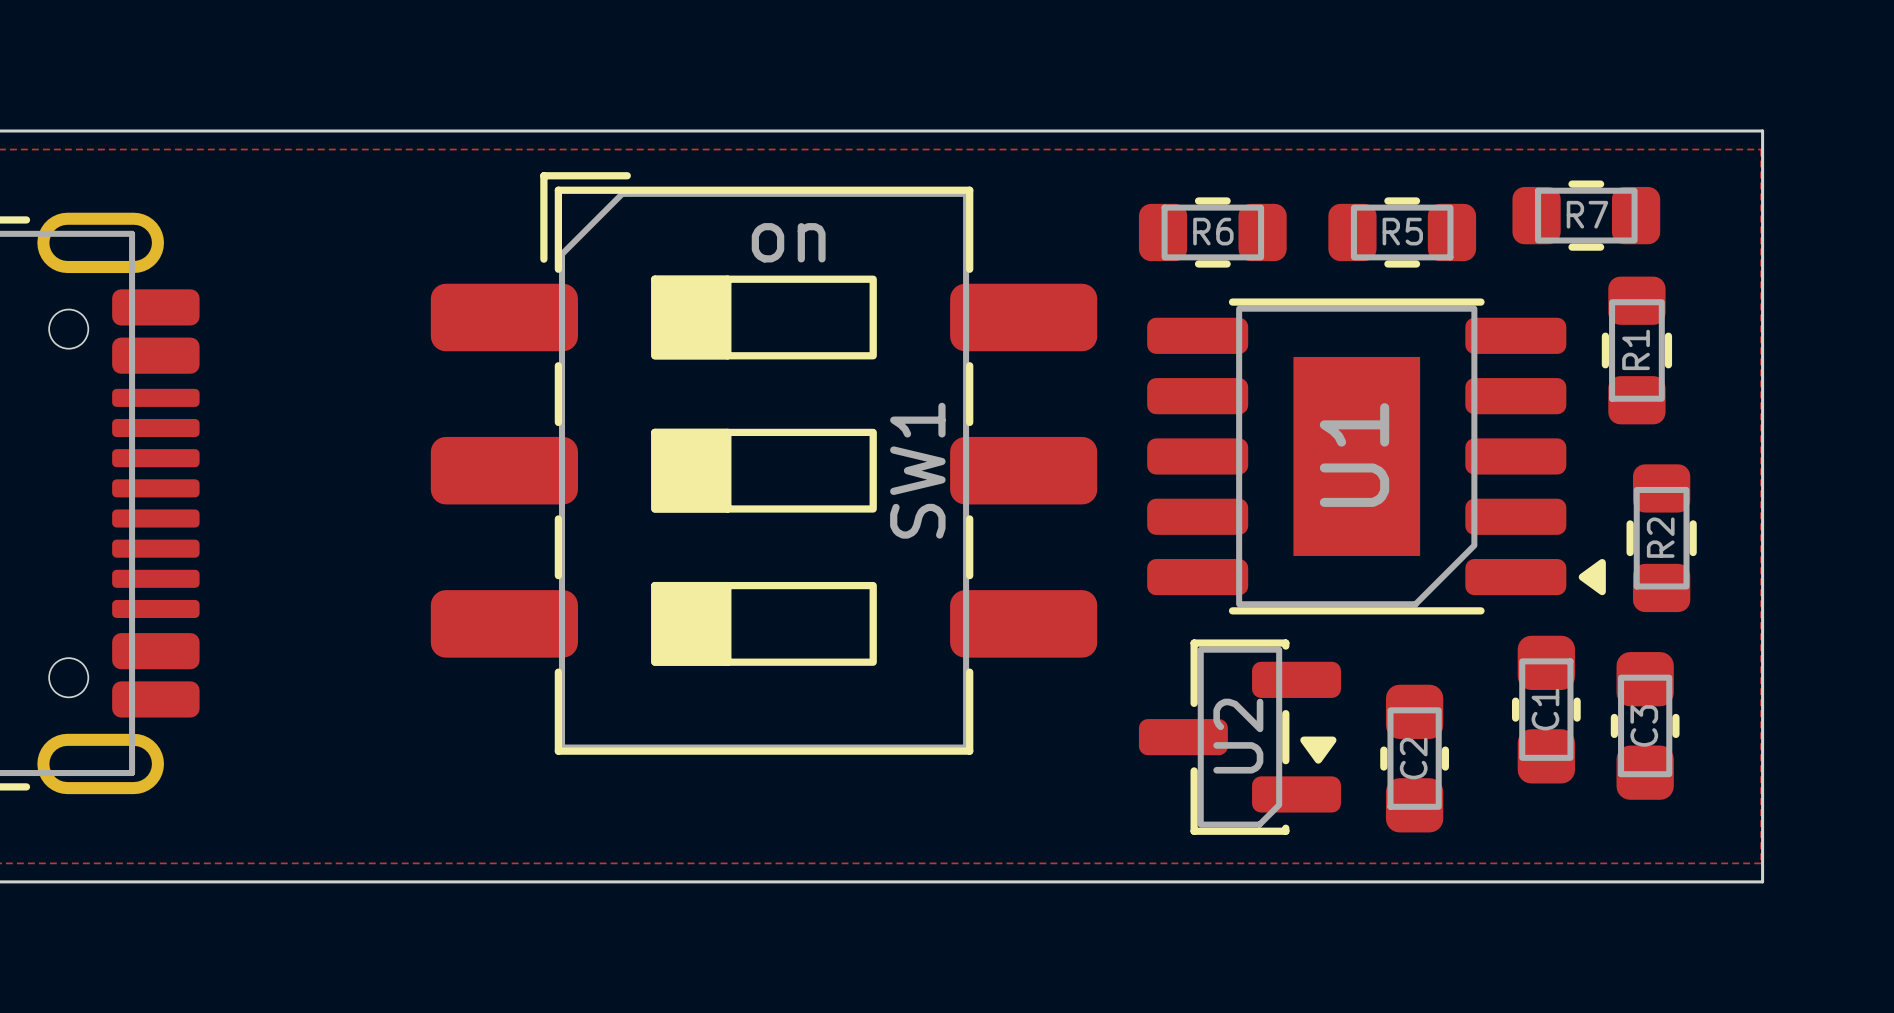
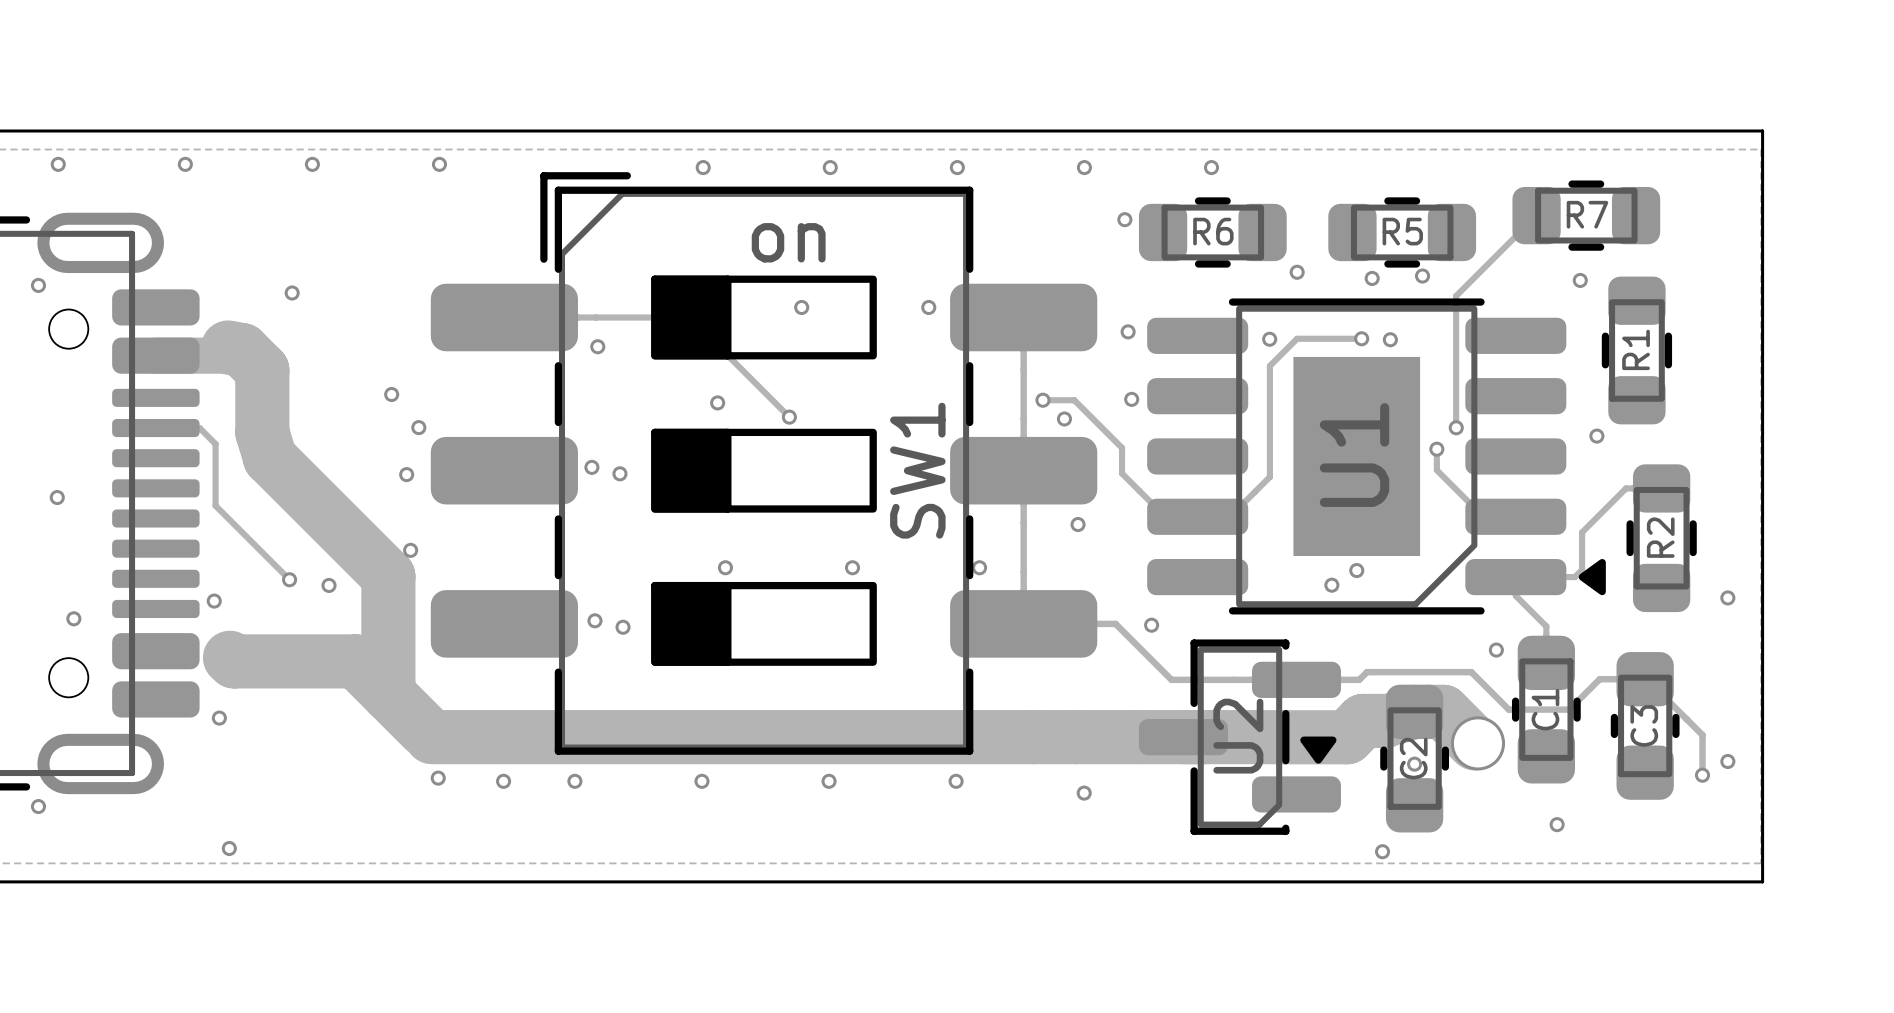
via: none -> (58, 164)
via: none -> (185, 164)
via: none -> (312, 164)
via: none -> (439, 164)
via: none -> (703, 167)
via: none -> (830, 167)
via: none -> (957, 167)
via: none -> (1084, 167)
via: none -> (1211, 167)
track: none -> (1536, 215) (1456, 296) (1456, 427)
via: none -> (1124, 219)
via: none -> (1297, 272)
via: none -> (1422, 276)
via: none -> (1372, 278)
via: none -> (1580, 280)
via: none -> (38, 285)
via: none -> (292, 292)
via: none -> (801, 307)
via: none -> (928, 307)
track: none -> (504, 317) (689, 317) (789, 417)
track: none -> (1023, 317) (1023, 623) (1115, 623) (1171, 679) (1359, 679) (1366, 672) (1471, 672) (1508, 709) (1569, 709) (1599, 679) (1646, 679) (1702, 735) (1702, 775)
via: none -> (1128, 331)
track: none -> (1361, 338) (1297, 338) (1269, 365) (1269, 476) (1230, 516) (1165, 516) (1122, 473) (1122, 447) (1074, 400) (1042, 400)
via: none -> (1361, 338)
via: none -> (1269, 339)
via: none -> (1390, 339)
via: none -> (597, 346)
track: none -> (155, 355) (219, 355) (228, 347) (242, 350) (262, 370) (262, 432) (270, 458) (388, 576) (388, 693)
via: none -> (391, 394)
via: none -> (1131, 399)
via: none -> (1042, 400)
via: none -> (717, 402)
via: none -> (789, 417)
via: none -> (1064, 418)
via: none -> (418, 427)
via: none -> (1456, 427)
track: none -> (155, 428) (199, 428) (215, 444) (215, 505) (289, 579)
via: none -> (1596, 436)
track: none -> (1436, 449) (1436, 470) (1483, 516) (1515, 516)
via: none -> (1436, 449)
via: none -> (591, 467)
via: none -> (619, 473)
via: none -> (406, 474)
track: none -> (1661, 488) (1626, 488) (1582, 532) (1582, 569) (1574, 577) (1515, 577) (1515, 595) (1546, 626) (1546, 662)
via: none -> (57, 497)
via: none -> (1078, 524)
via: none -> (410, 550)
via: none -> (725, 567)
via: none -> (852, 567)
via: none -> (979, 567)
via: none -> (1356, 570)
via: none -> (289, 579)
via: none -> (329, 585)
via: none -> (1331, 585)
via: none -> (1727, 597)
via: none -> (214, 601)
via: none -> (73, 618)
via: none -> (594, 620)
via: none -> (1151, 625)
via: none -> (623, 627)
via: none -> (1496, 650)
track: none -> (229, 651) (229, 657) (234, 661) (356, 661) (431, 737) (1255, 737)
via: none -> (219, 718)
track: none -> (1255, 737) (1346, 737) (1363, 720) (1385, 720) (1414, 711) (1443, 711) (1474, 743) (1477, 743)
via: none -> (1477, 743)
via: none -> (1727, 761)
via: none -> (1414, 764)
via: none -> (1702, 775)
via: none -> (438, 778)
via: none -> (503, 781)
via: none -> (574, 781)
via: none -> (701, 781)
via: none -> (829, 781)
via: none -> (956, 781)
via: none -> (1084, 793)
via: none -> (38, 806)
via: none -> (1557, 824)
via: none -> (229, 848)
via: none -> (1382, 851)

